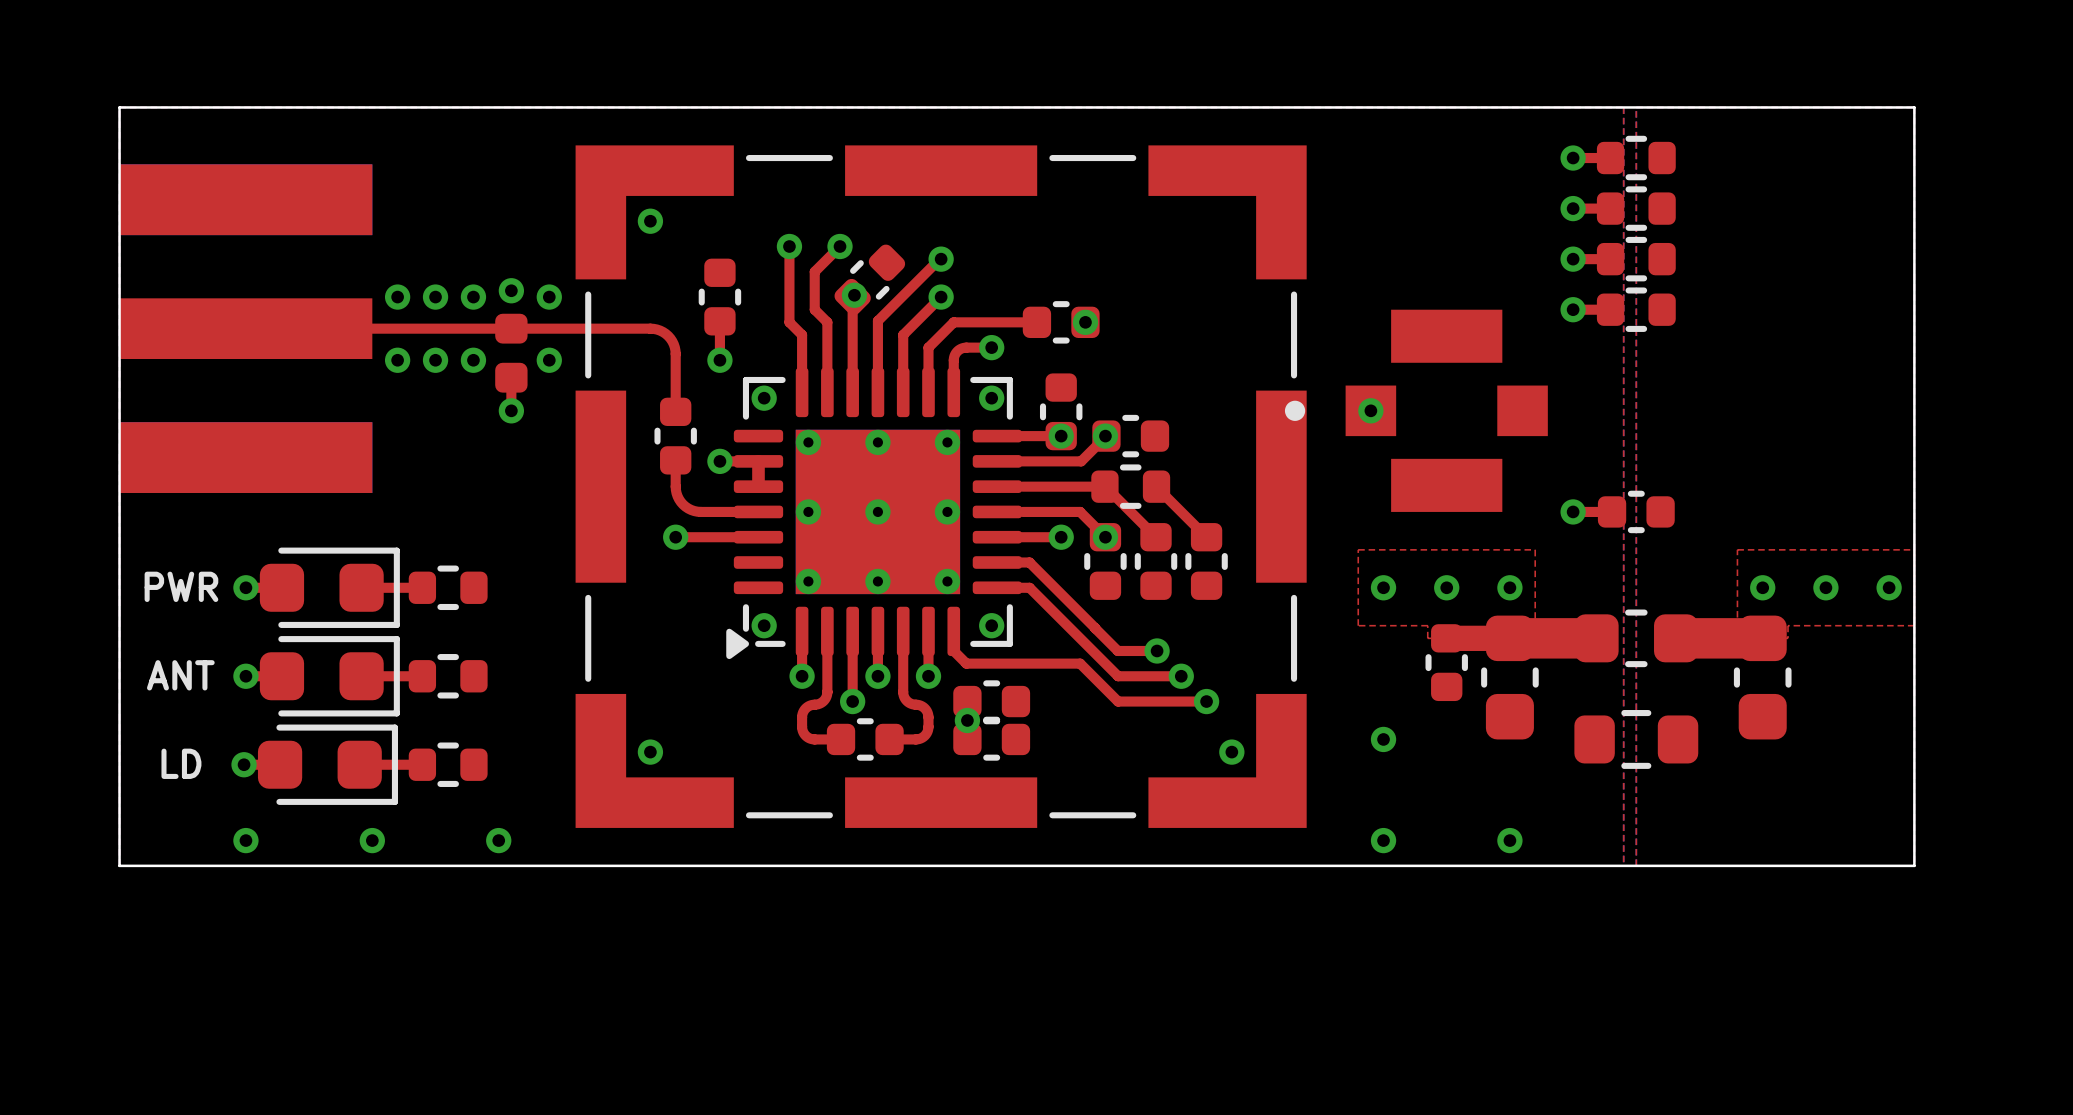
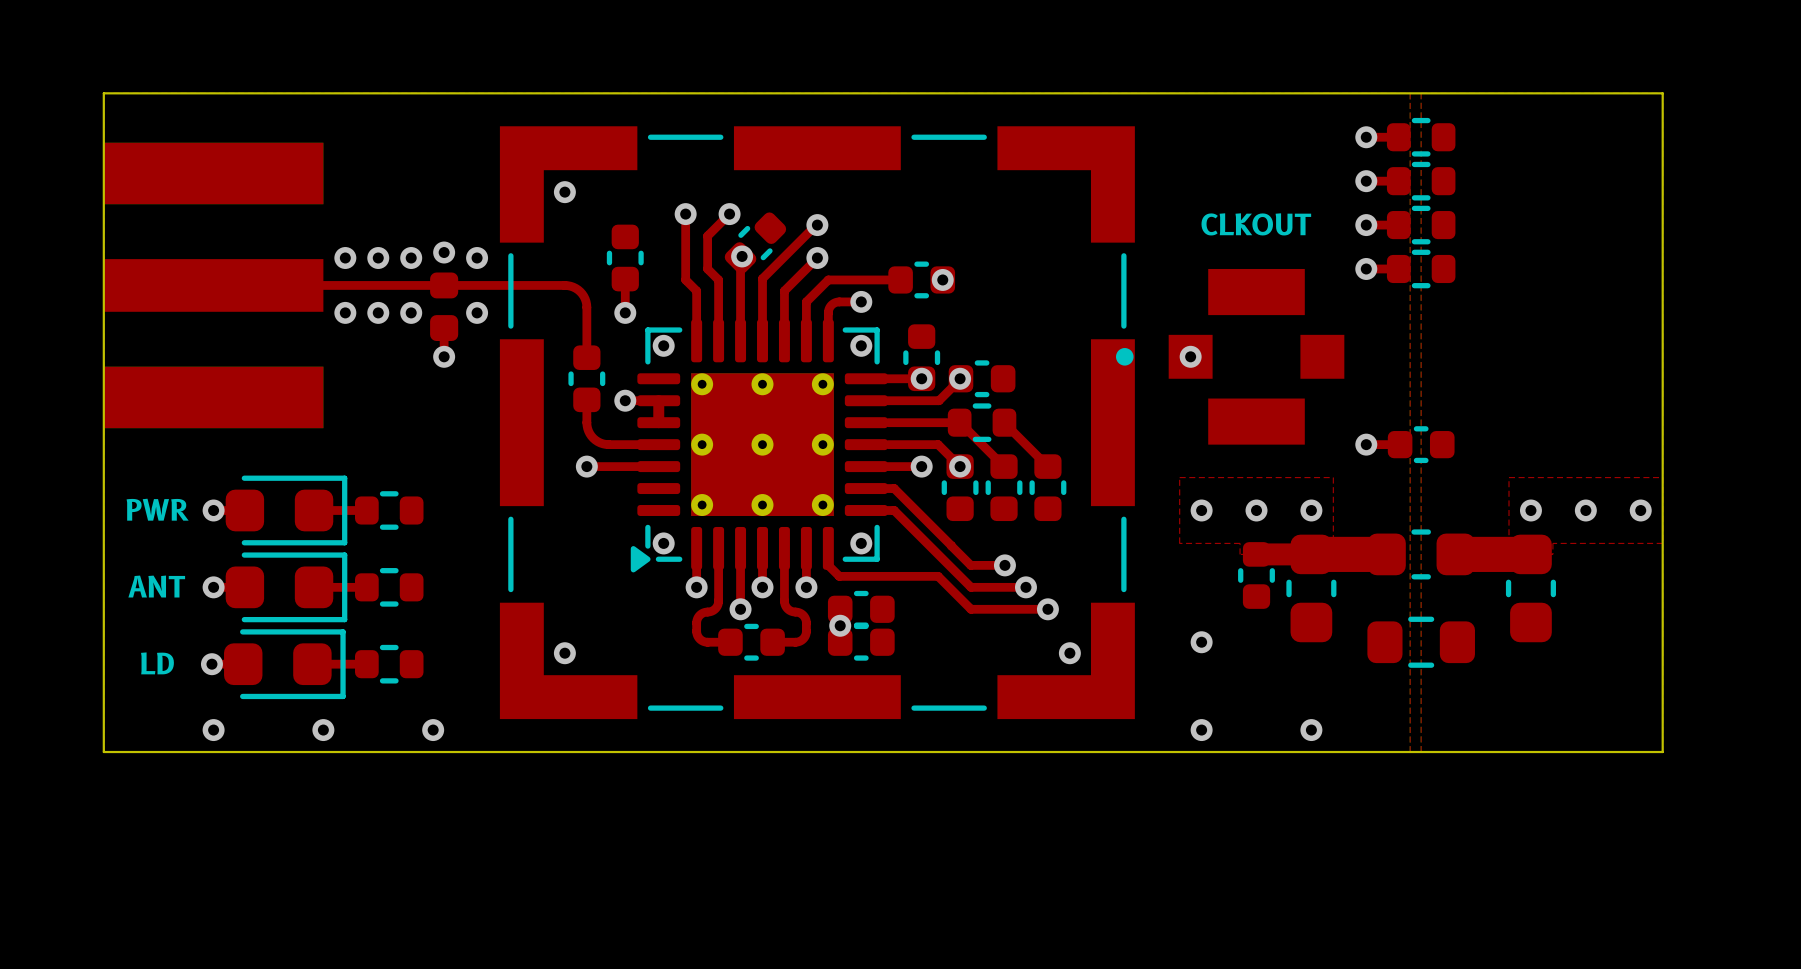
text: none -> CLKOUT (1256, 224)

